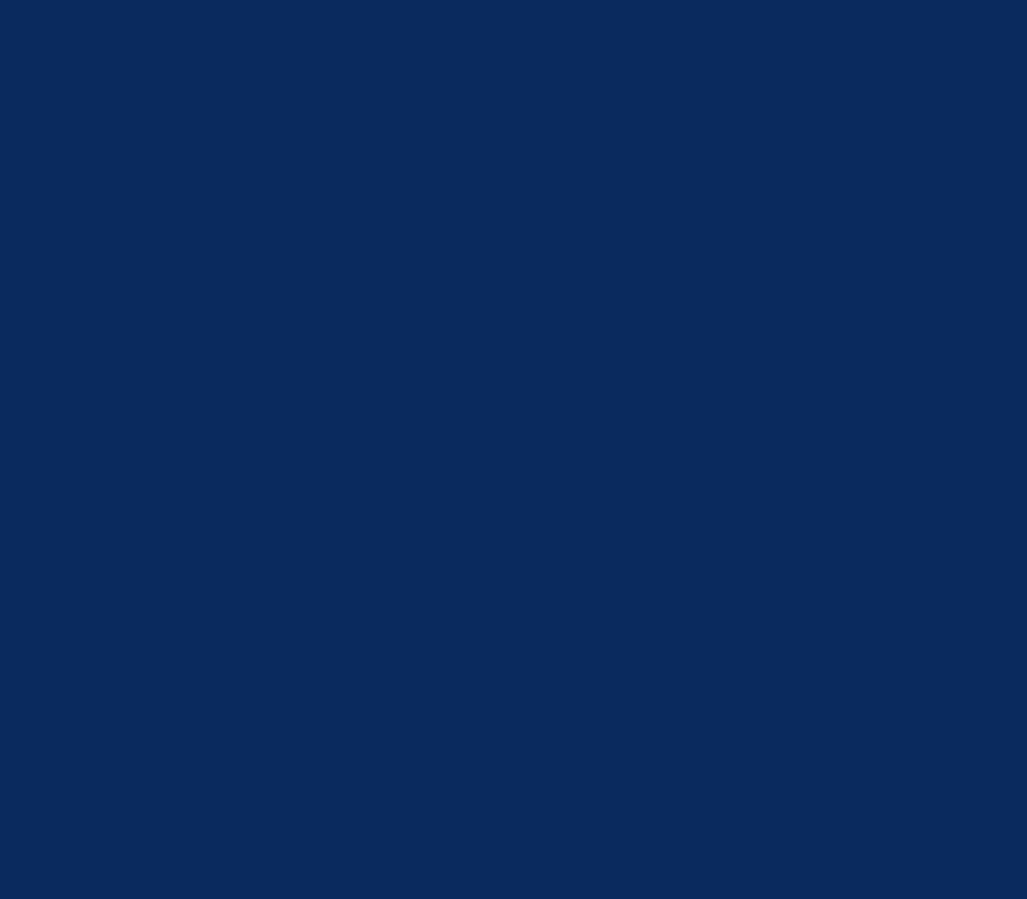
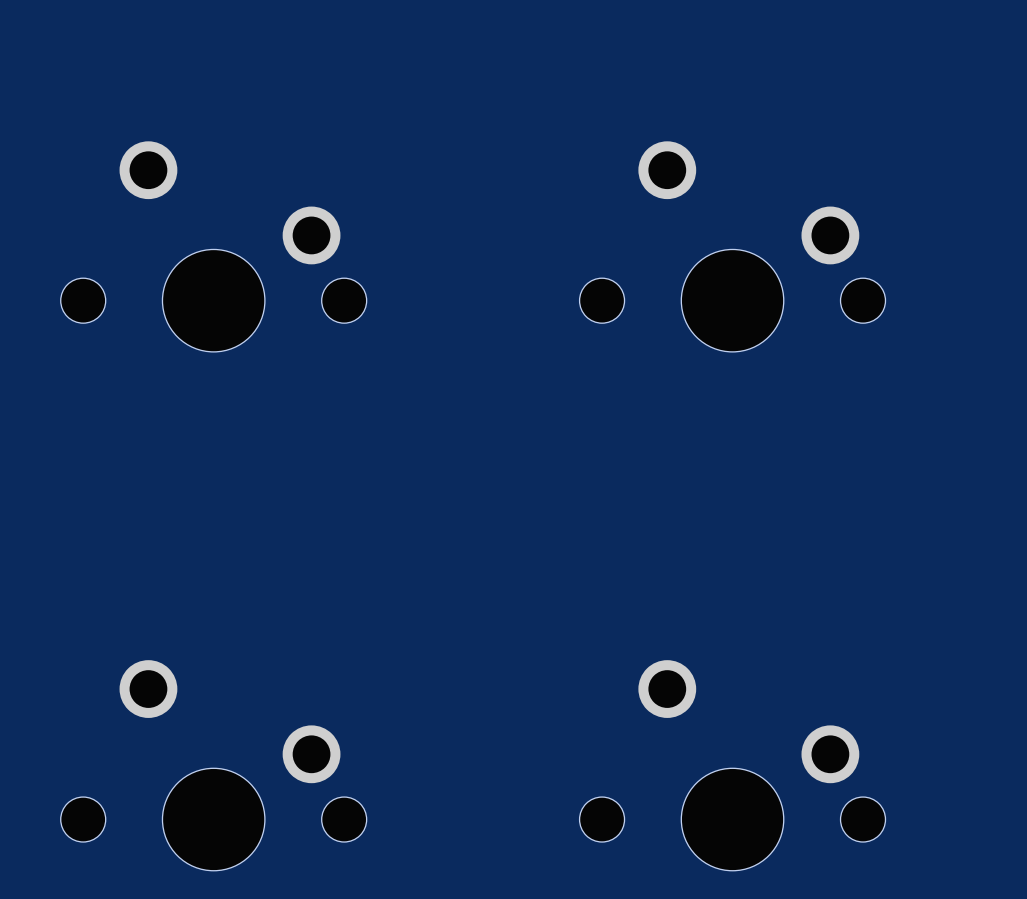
part: none -> (213, 246)
part: none -> (732, 246)
part: none -> (213, 765)
part: none -> (732, 765)

